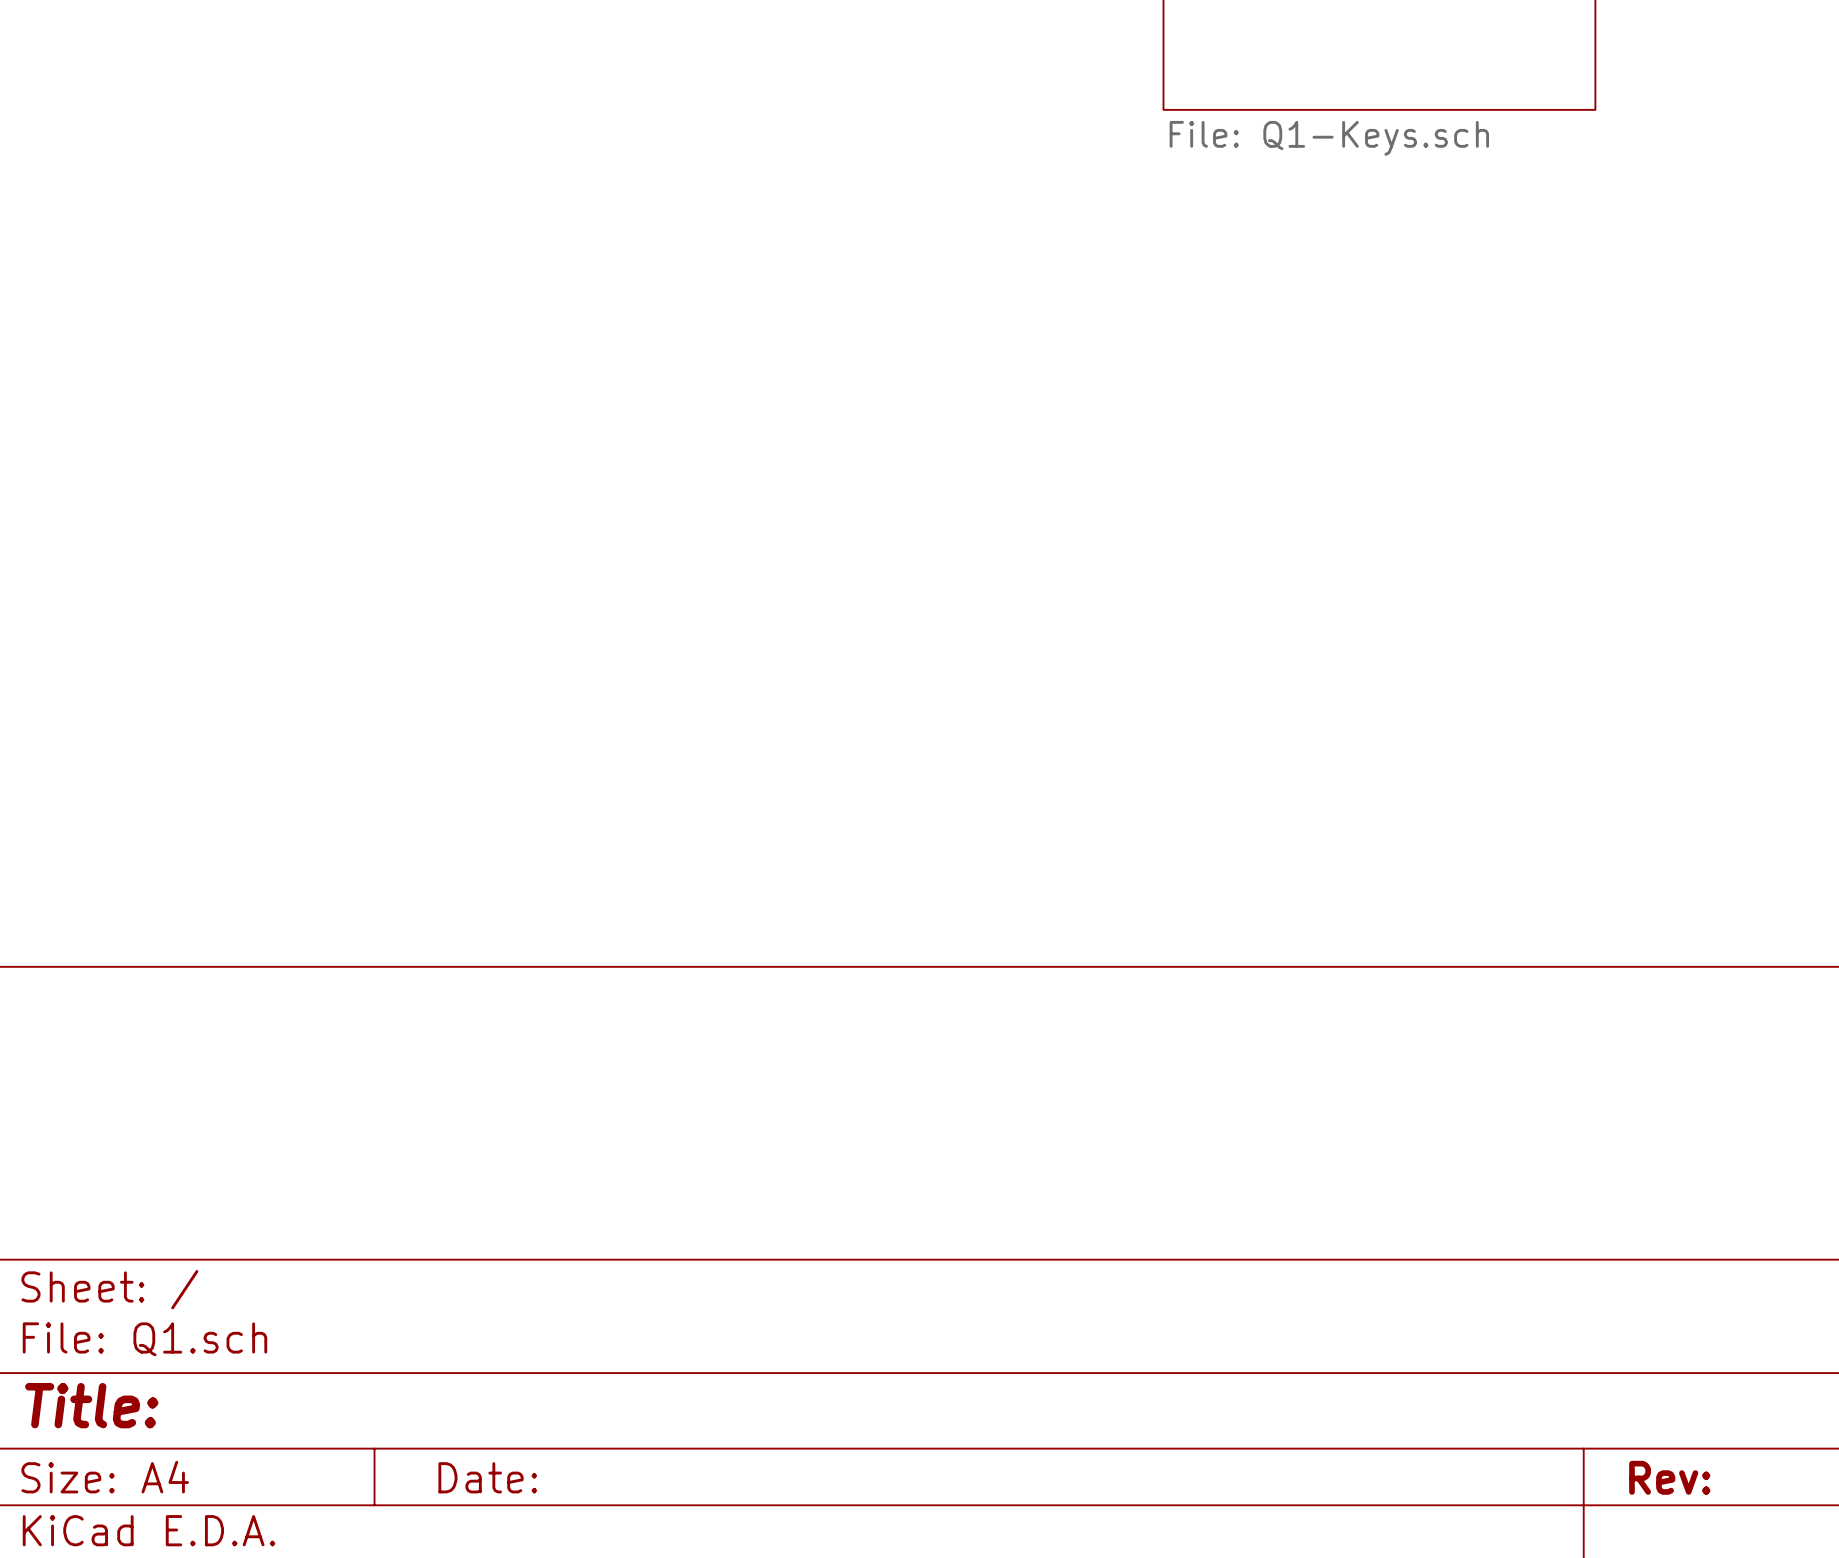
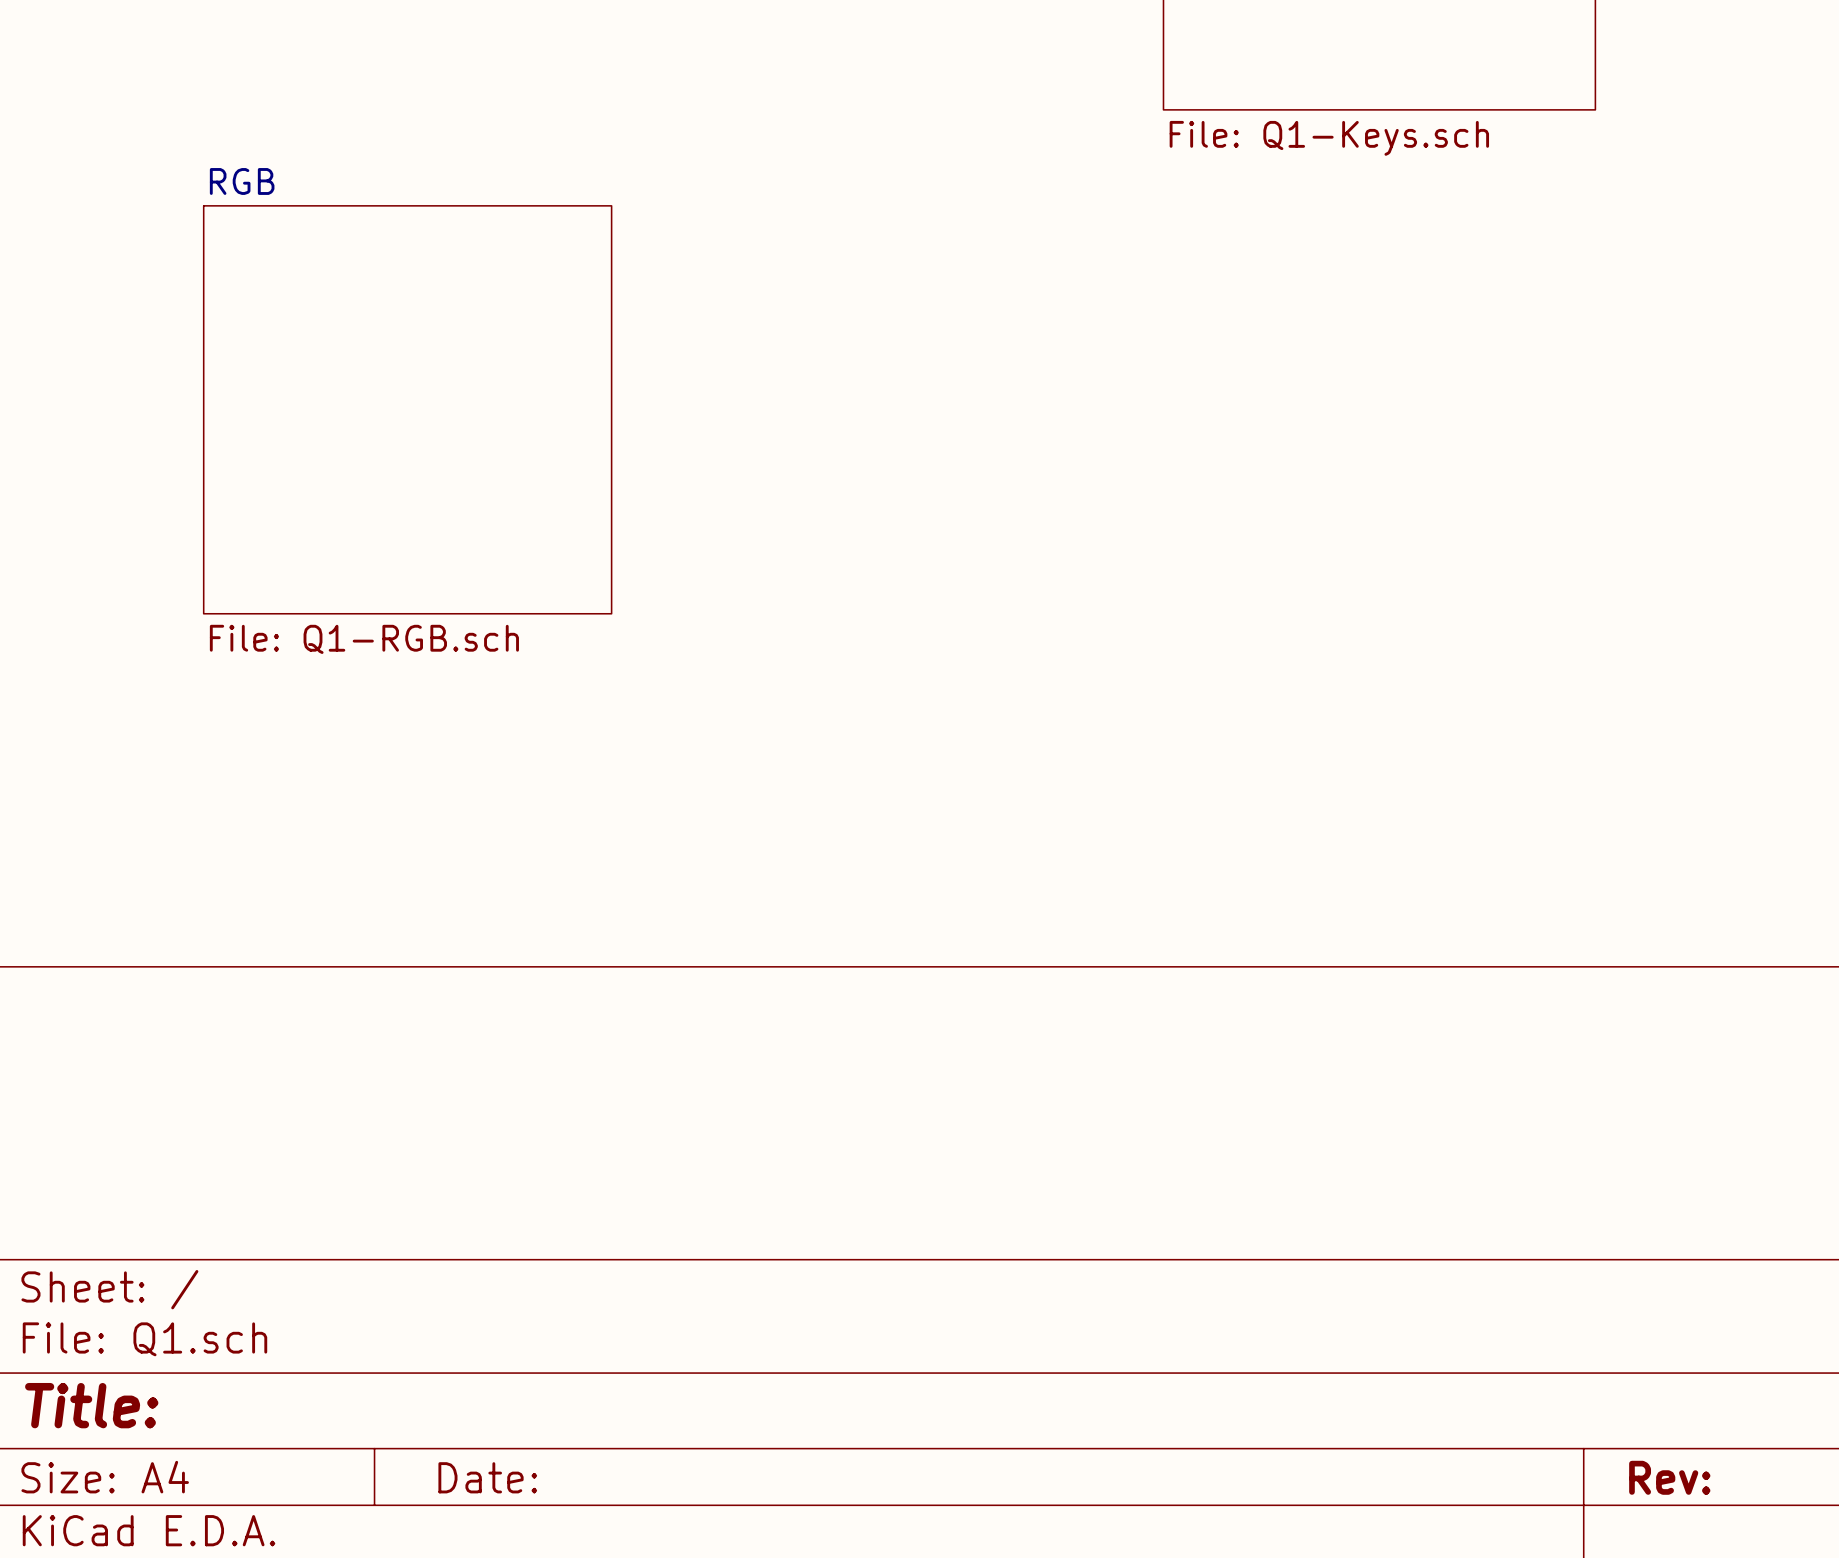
sheet RGB: none -> File: Q1-RGB.sch (407, 409)

